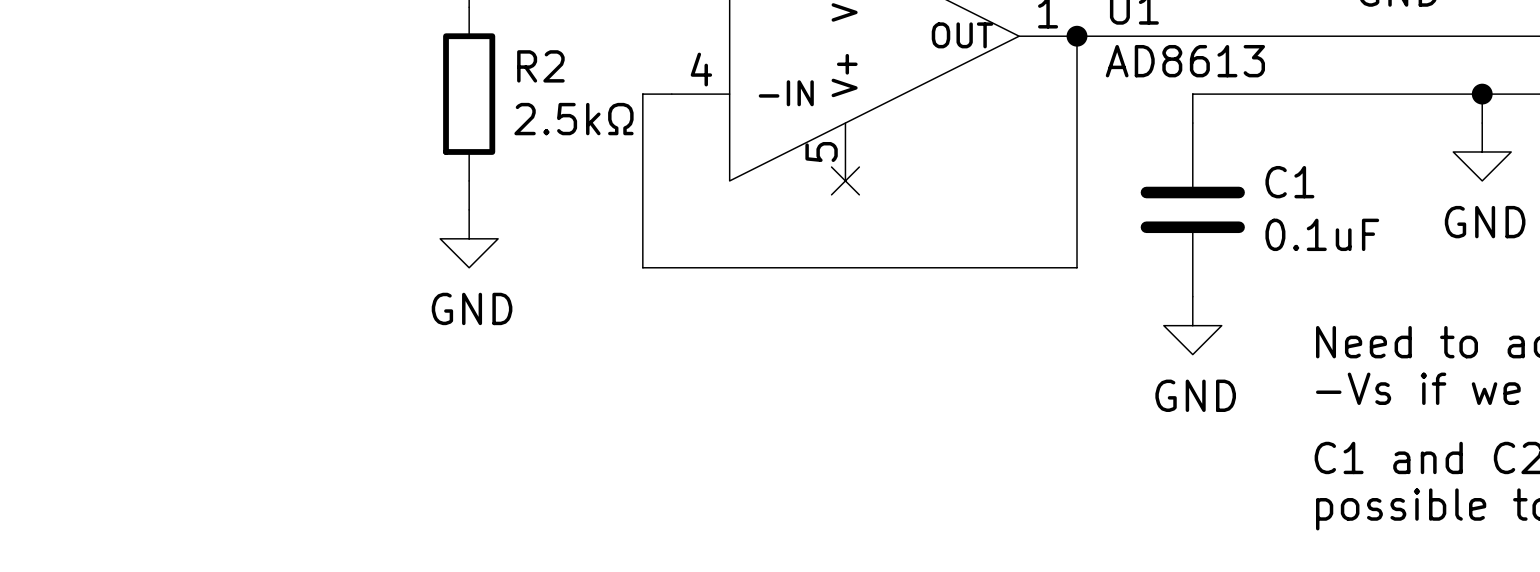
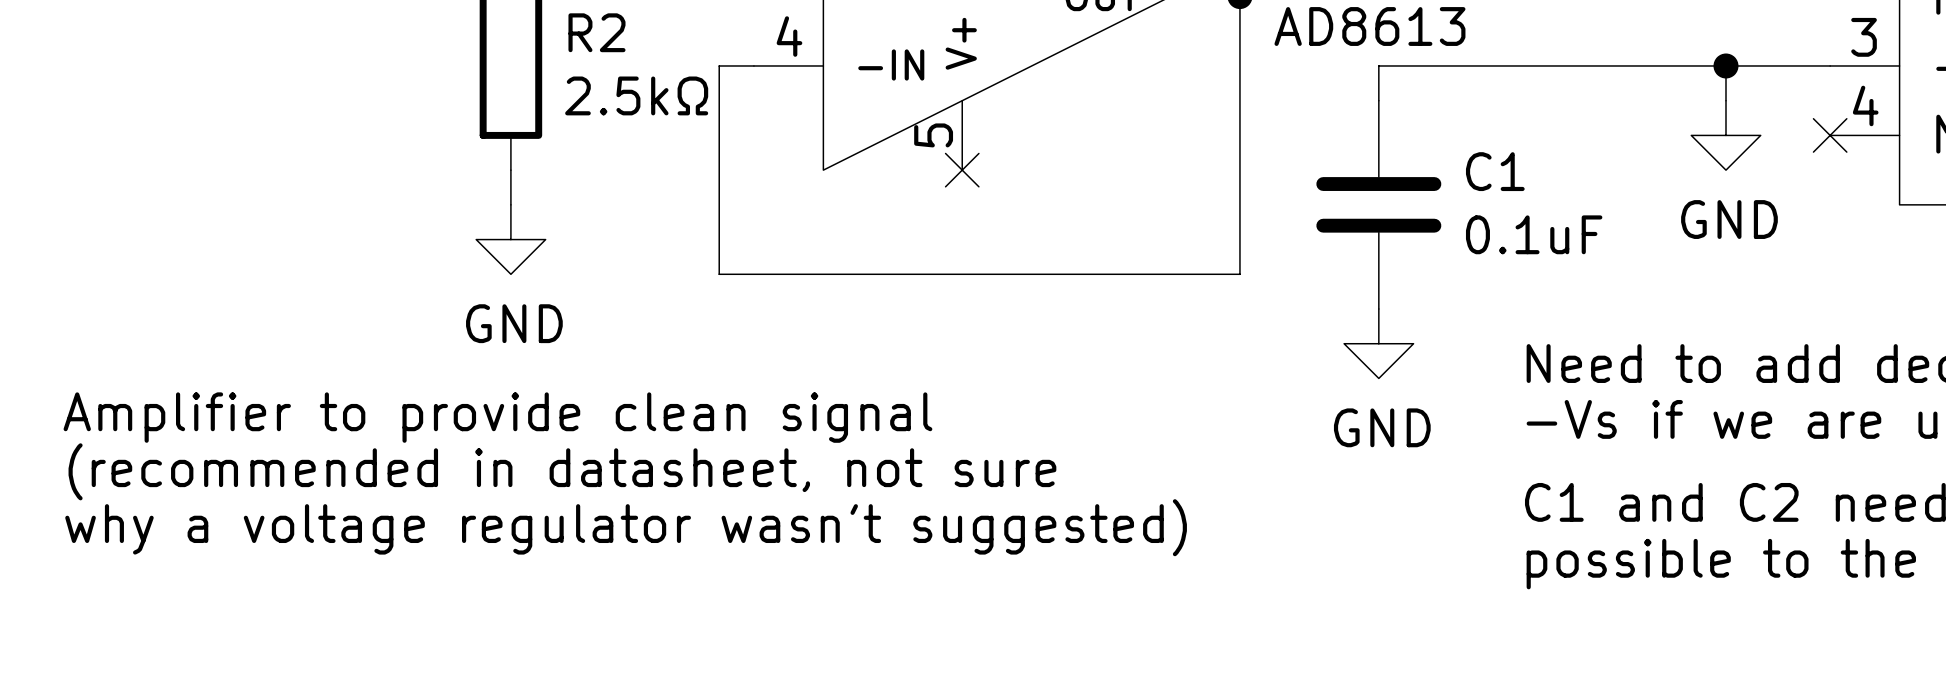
text: none -> Amplifier to provide clean signal (497, 417)
text: none -> (recommended in datasheet, not sure (562, 471)
text: none -> why a voltage regulator wasn't suggested) (626, 527)

